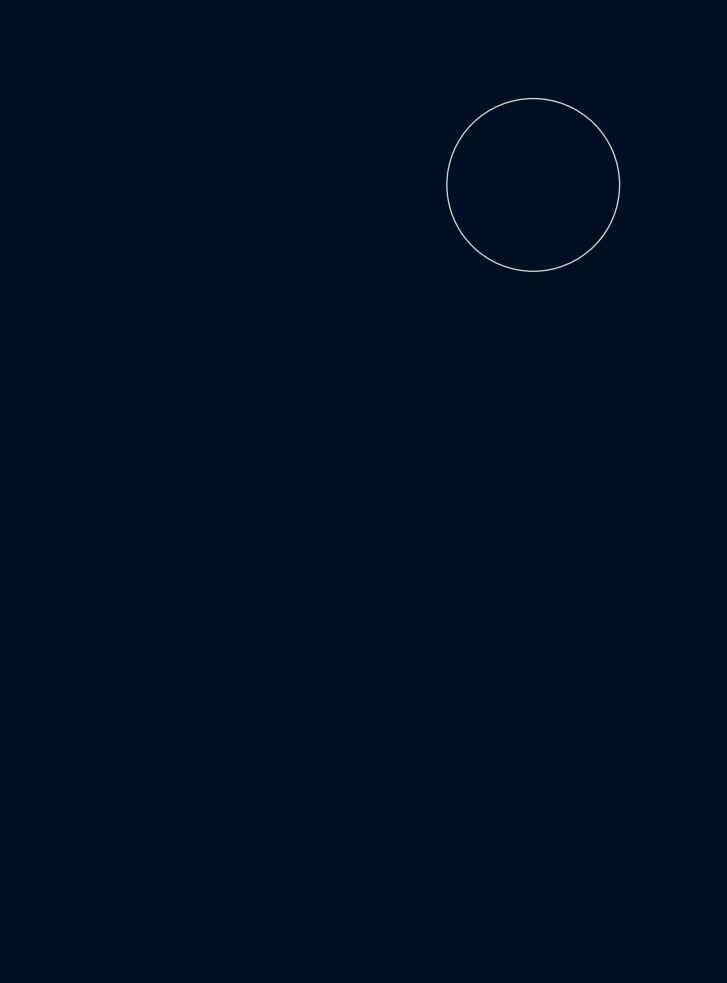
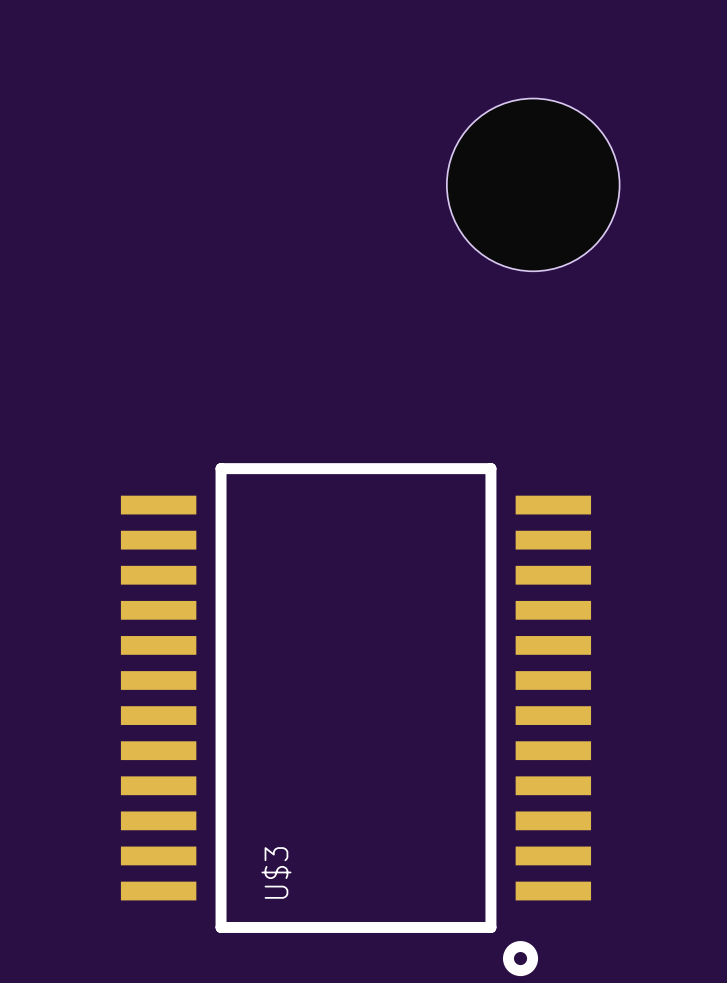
U$3: none -> (355, 719)

